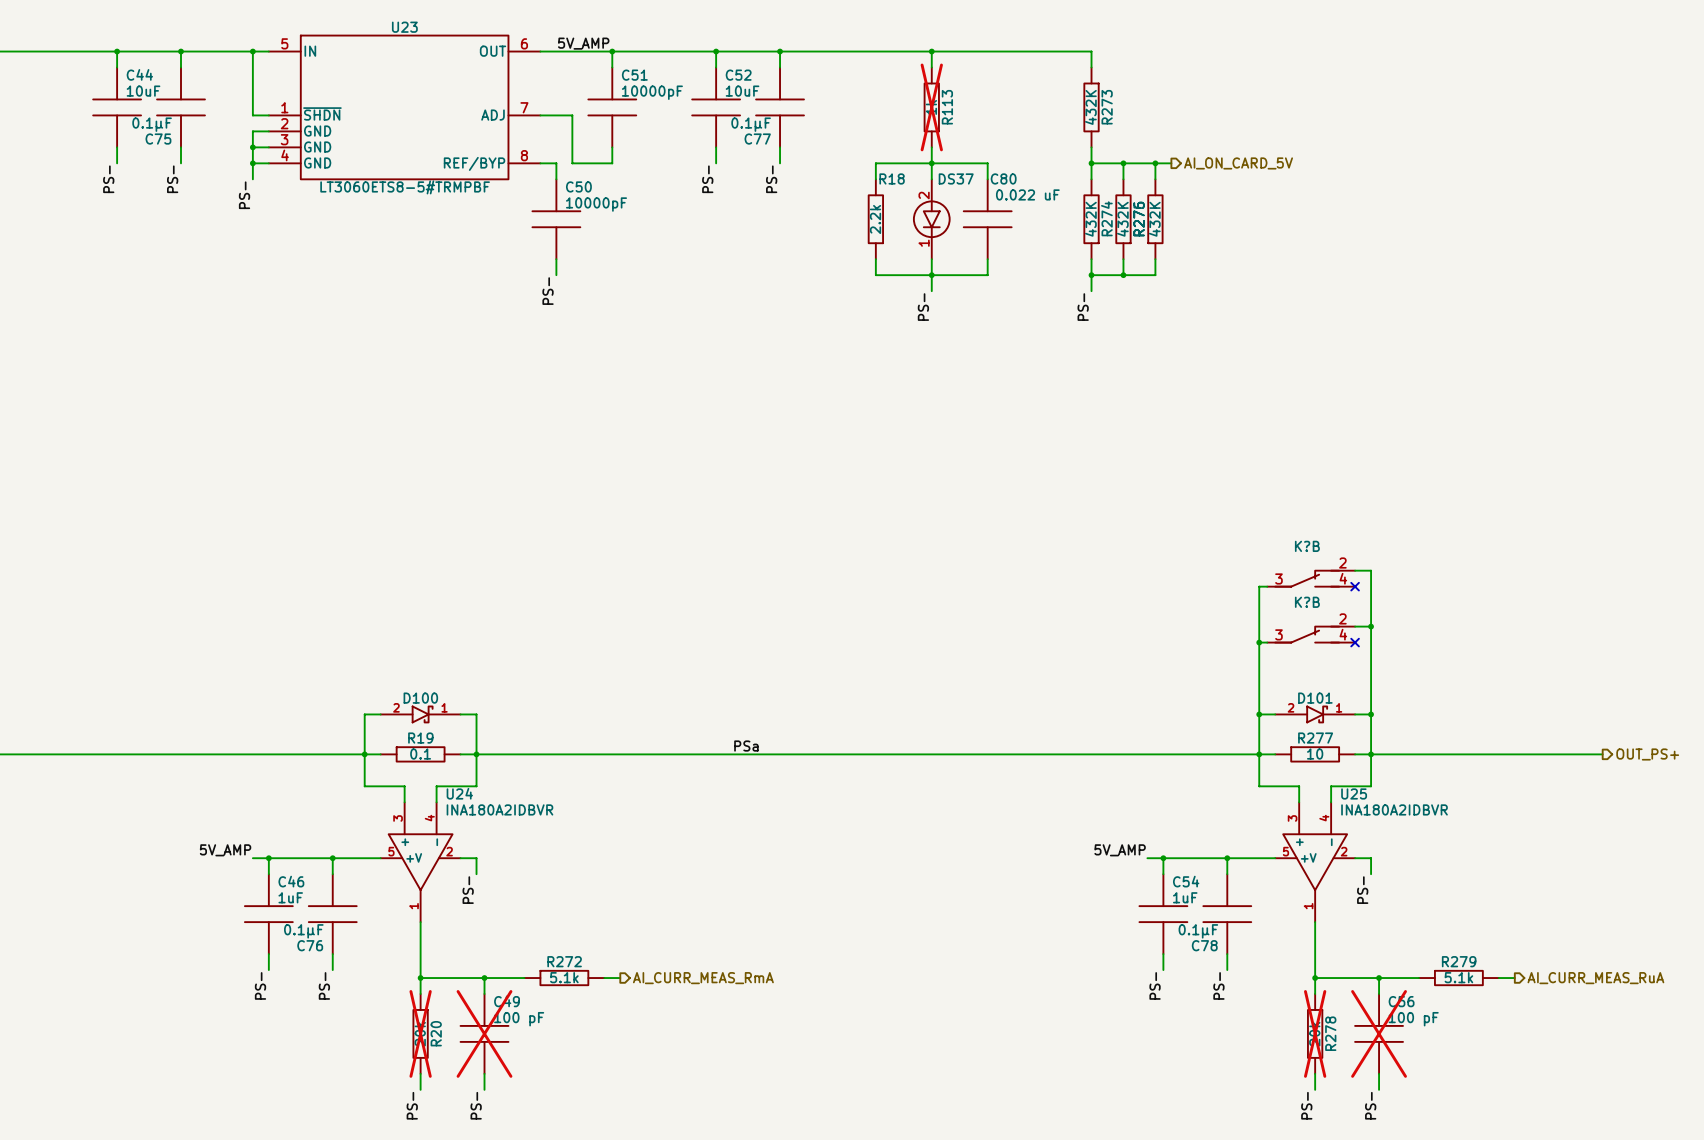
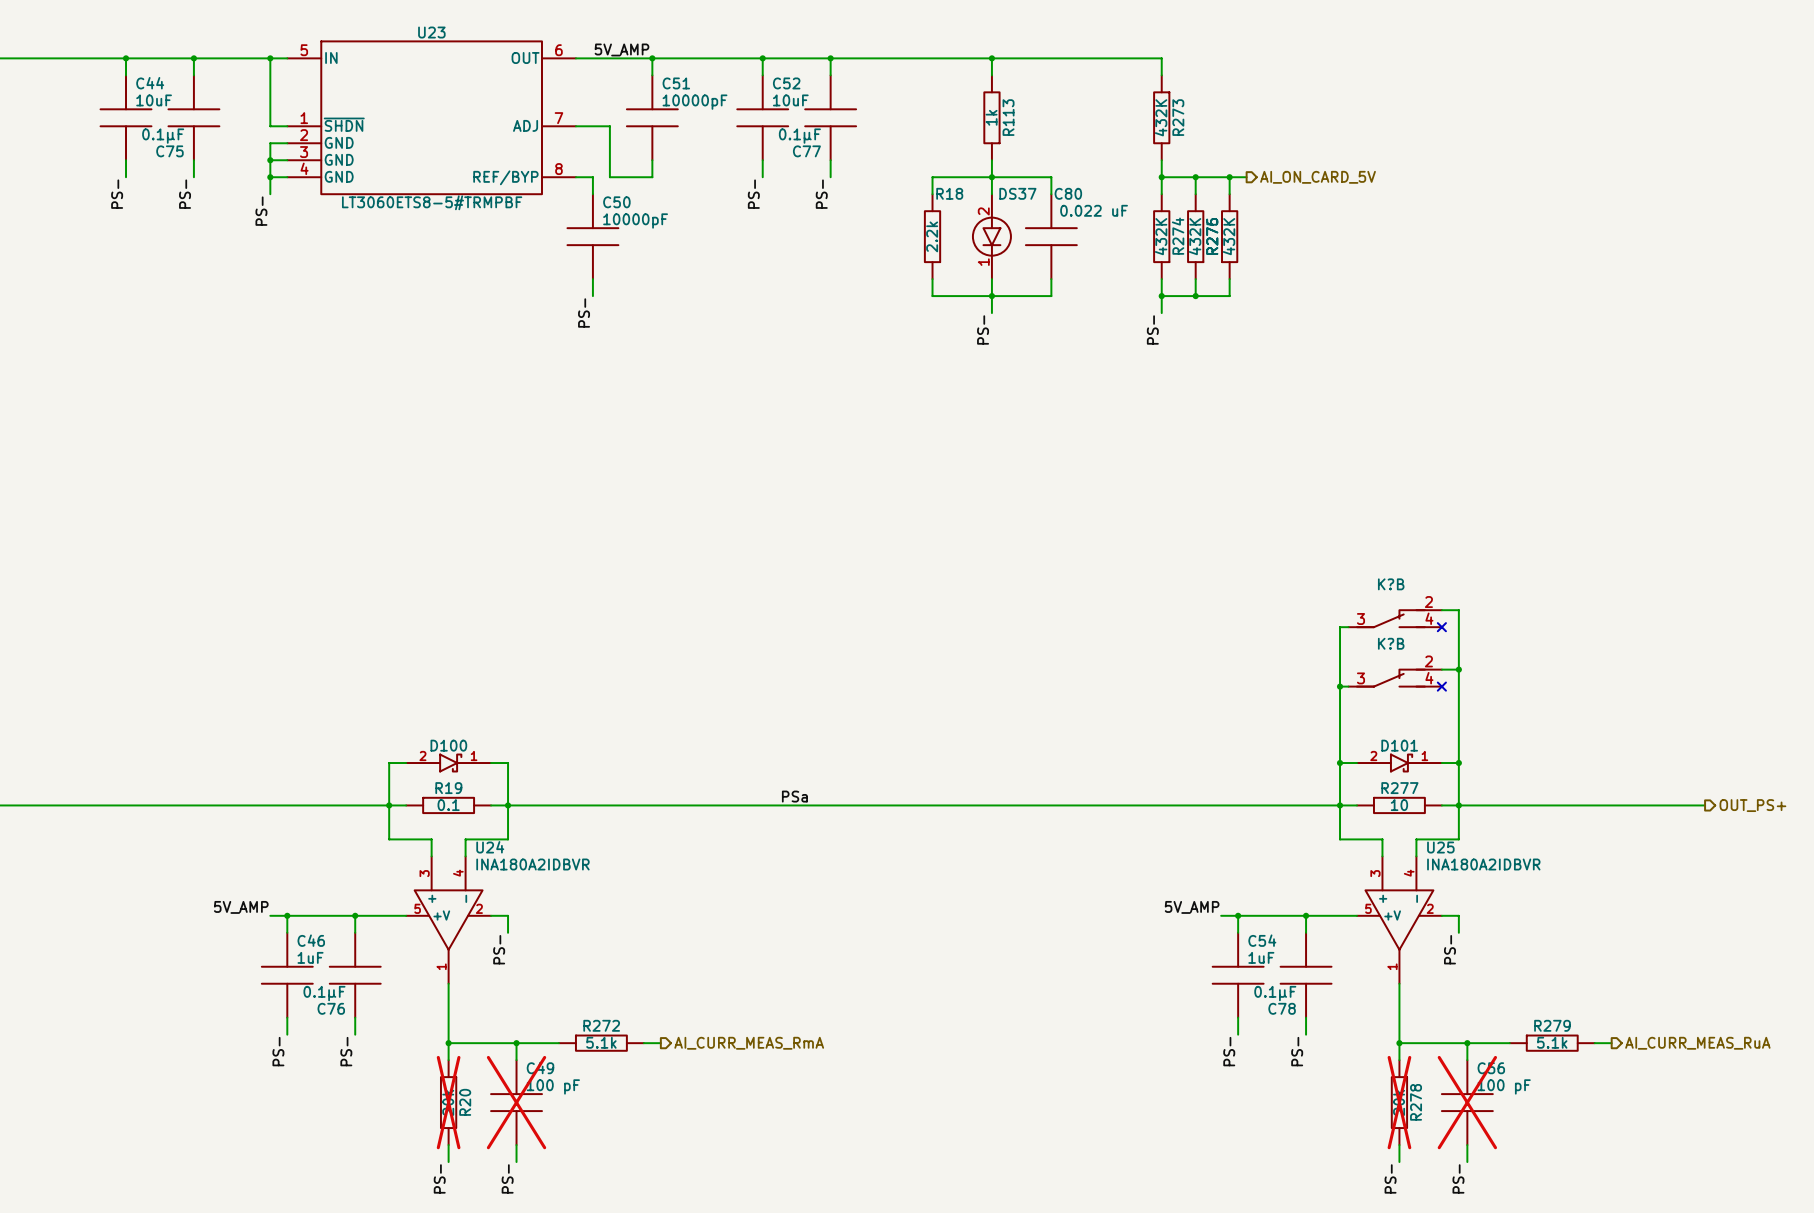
R113 do-not-place cross: (931, 107) -> none

